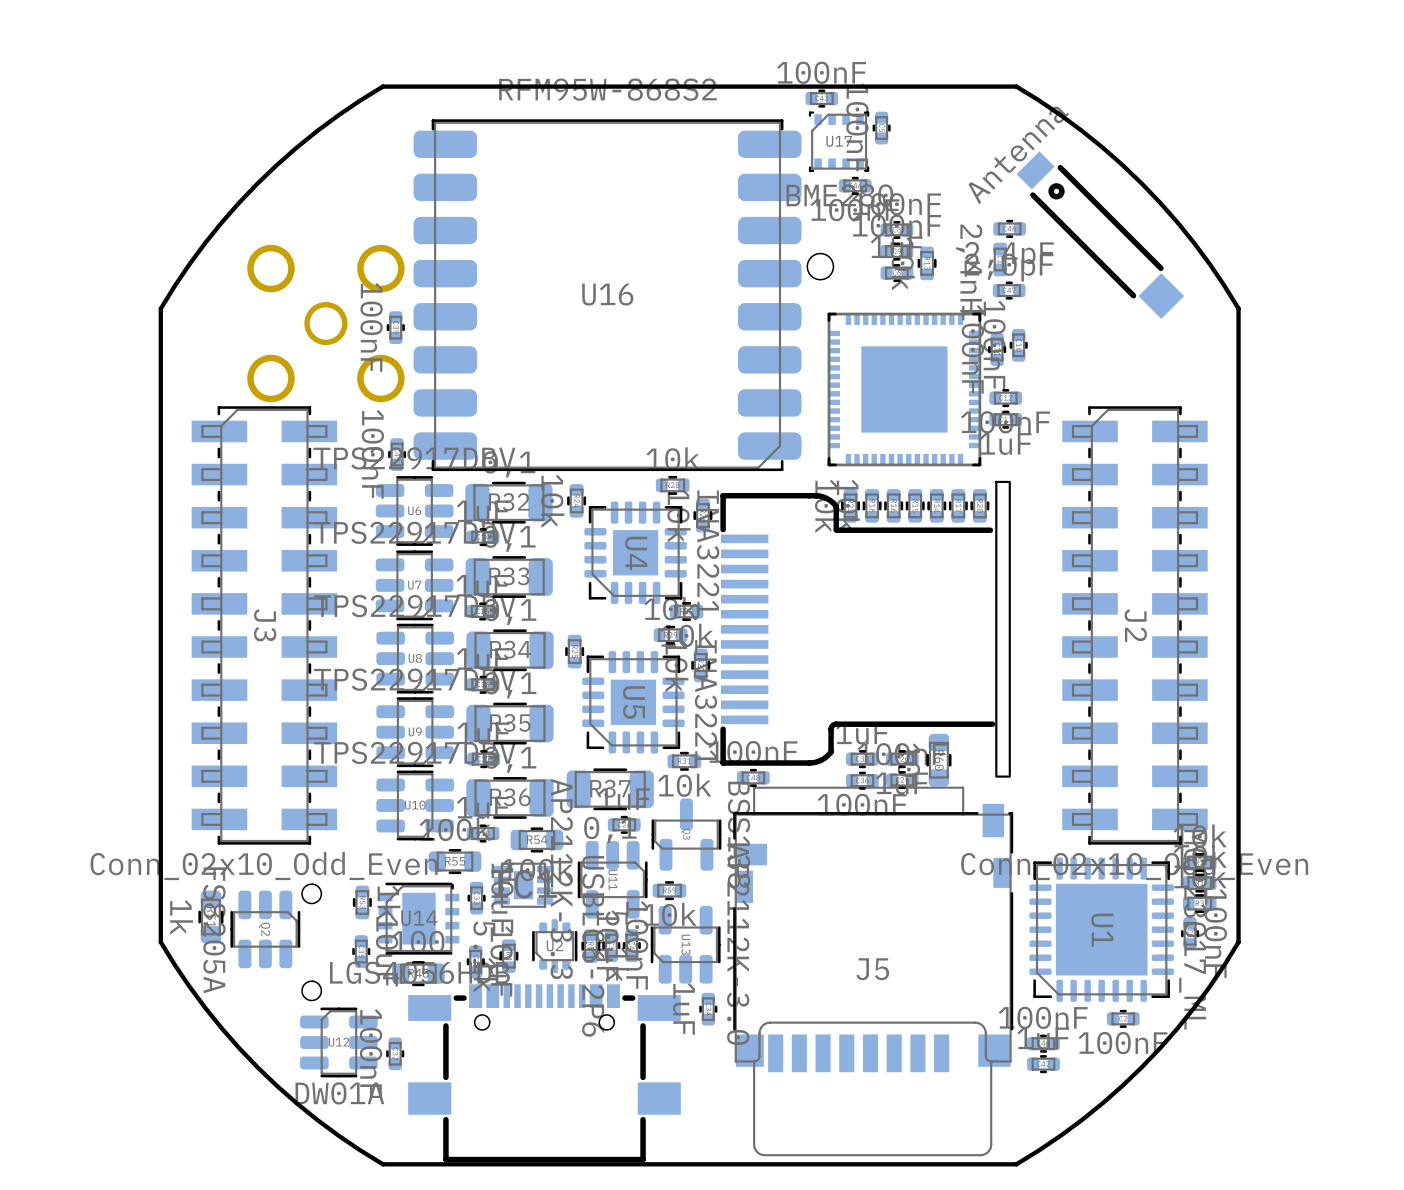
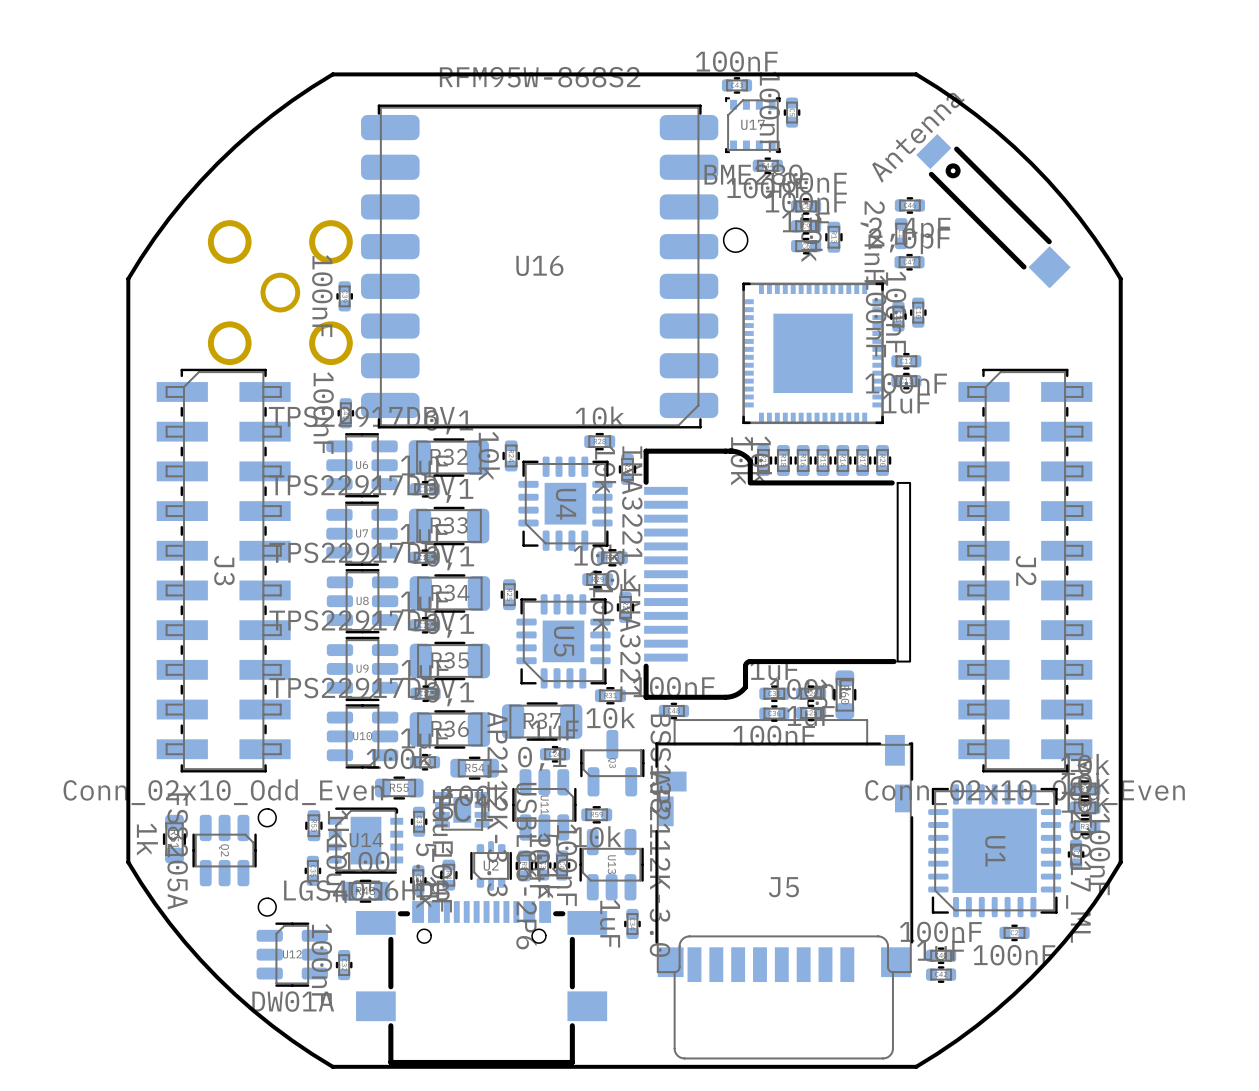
part footprint: [720, 480, 1011, 778] -> [643, 448, 912, 700]
U11 footprint: [577, 841, 648, 919] -> [512, 769, 577, 841]

